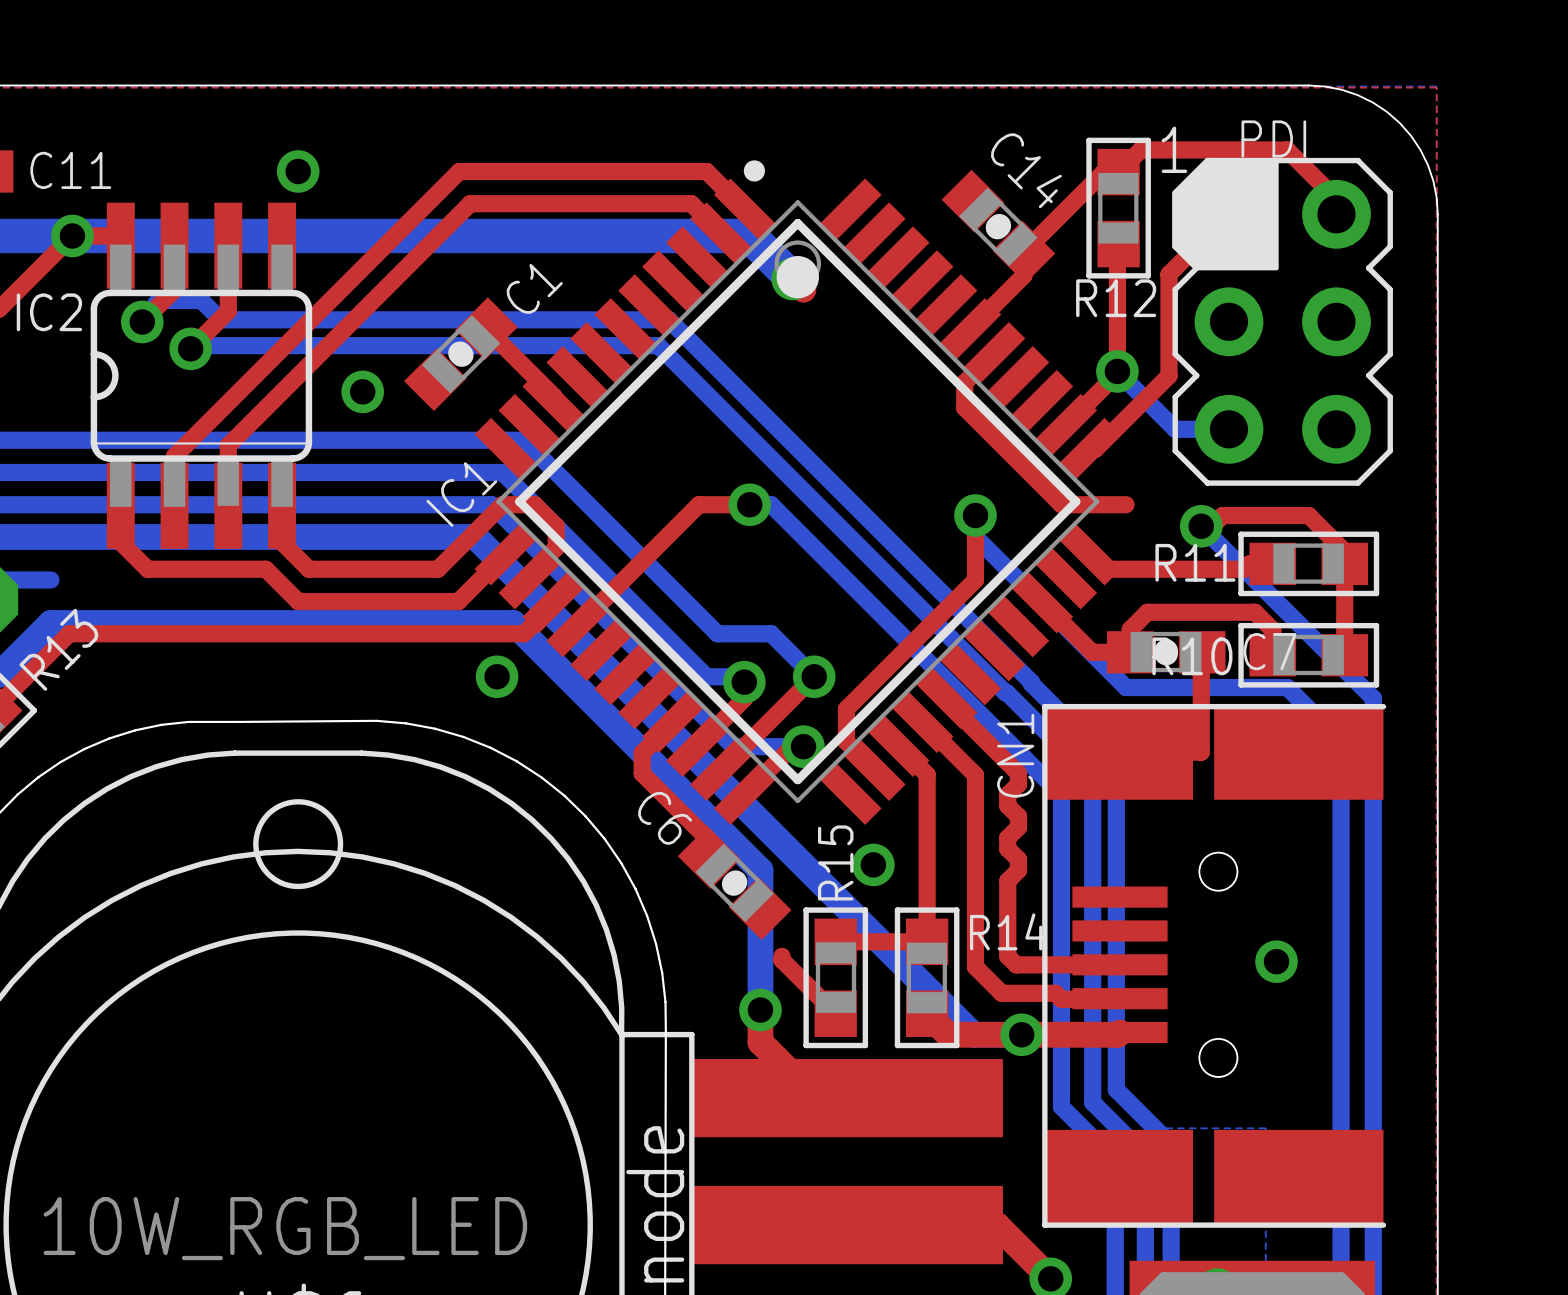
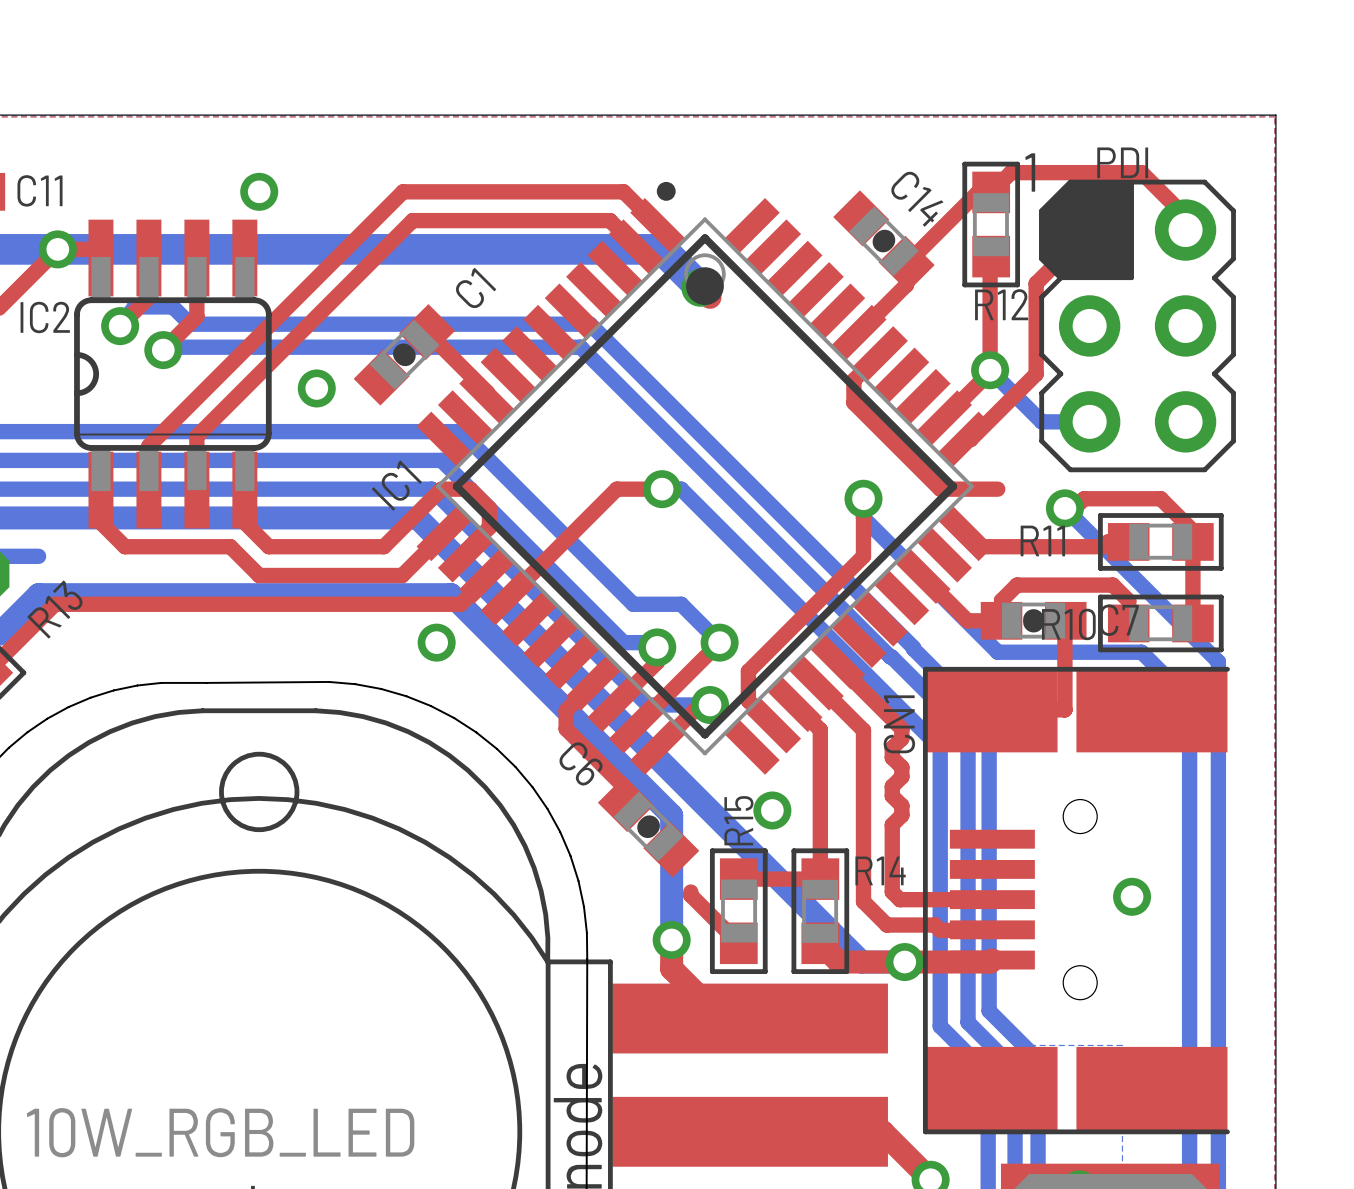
board edge: (1308, 85) (1325, 86) (1358, 95) (1373, 102) (1400, 123) (1420, 149) (1427, 165) (1436, 197) (1437, 214) -> (1160, 115) (1275, 115) (1275, 230)

